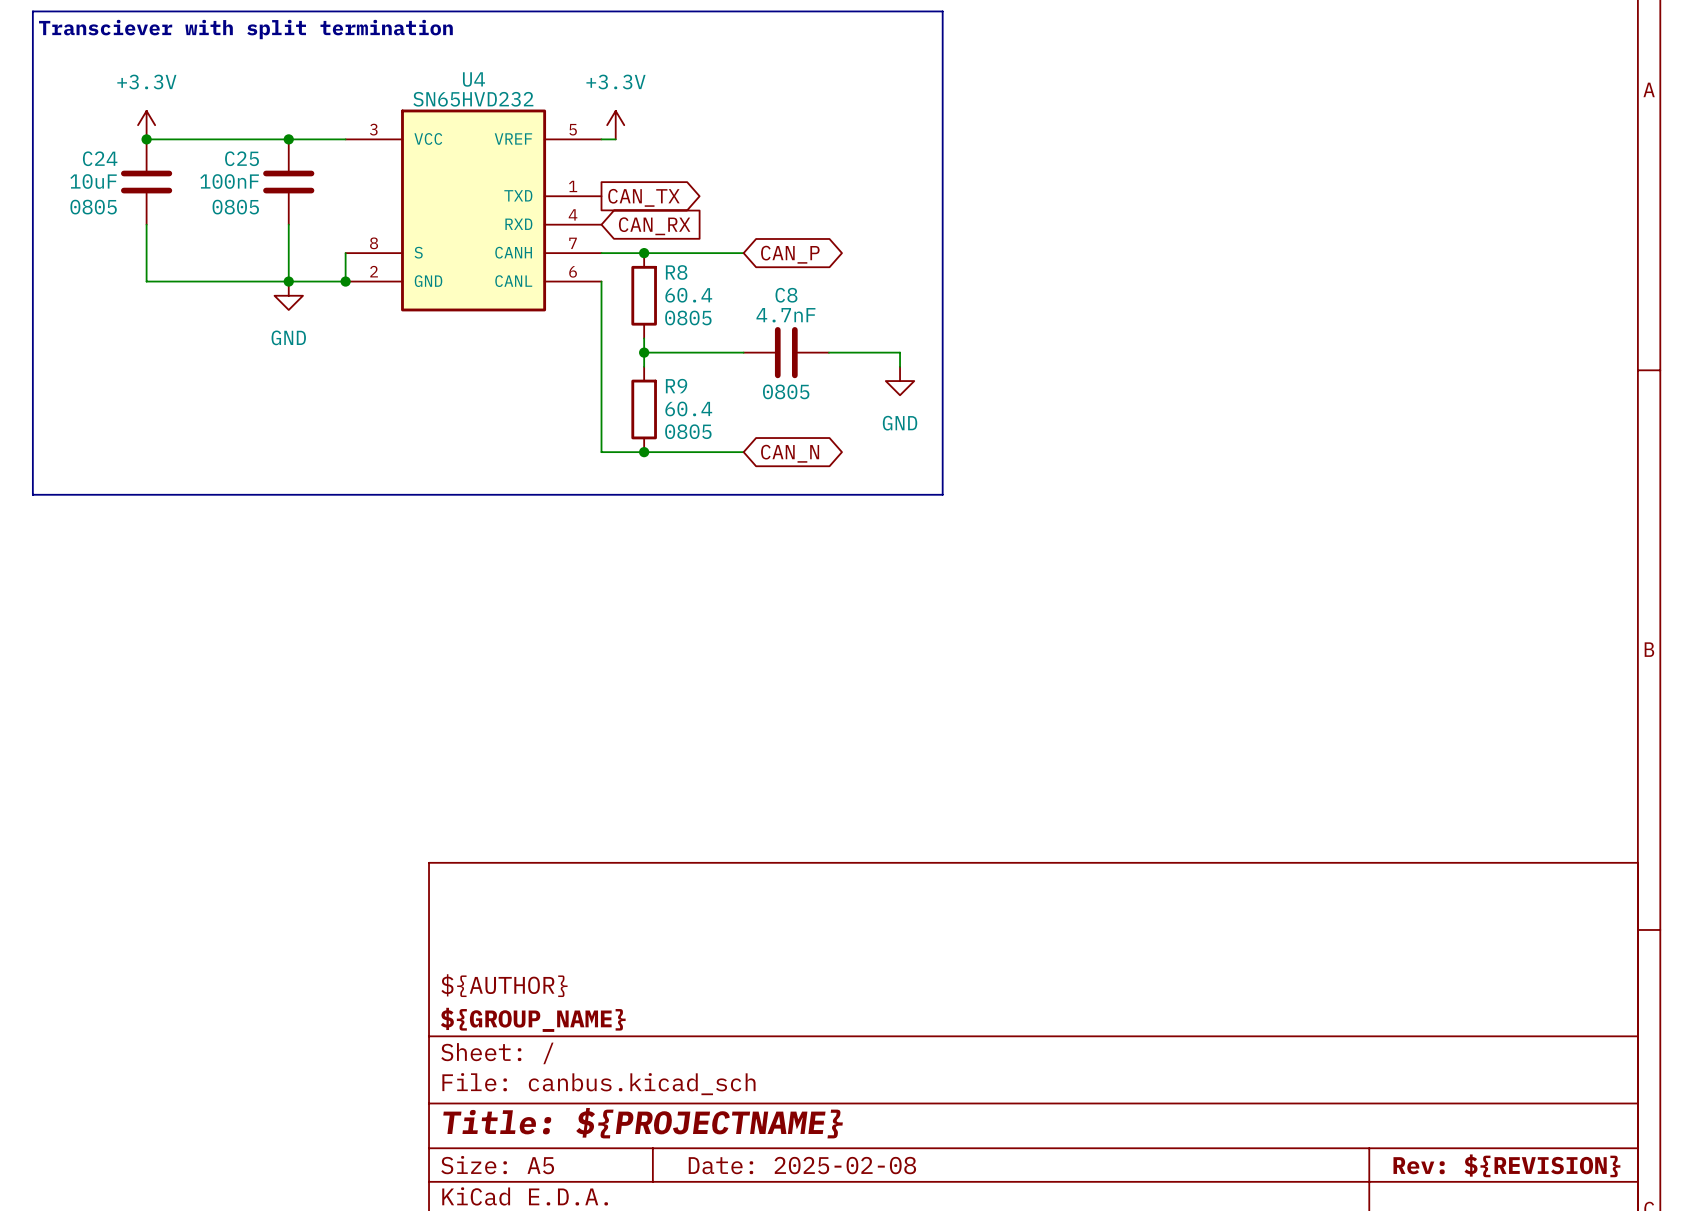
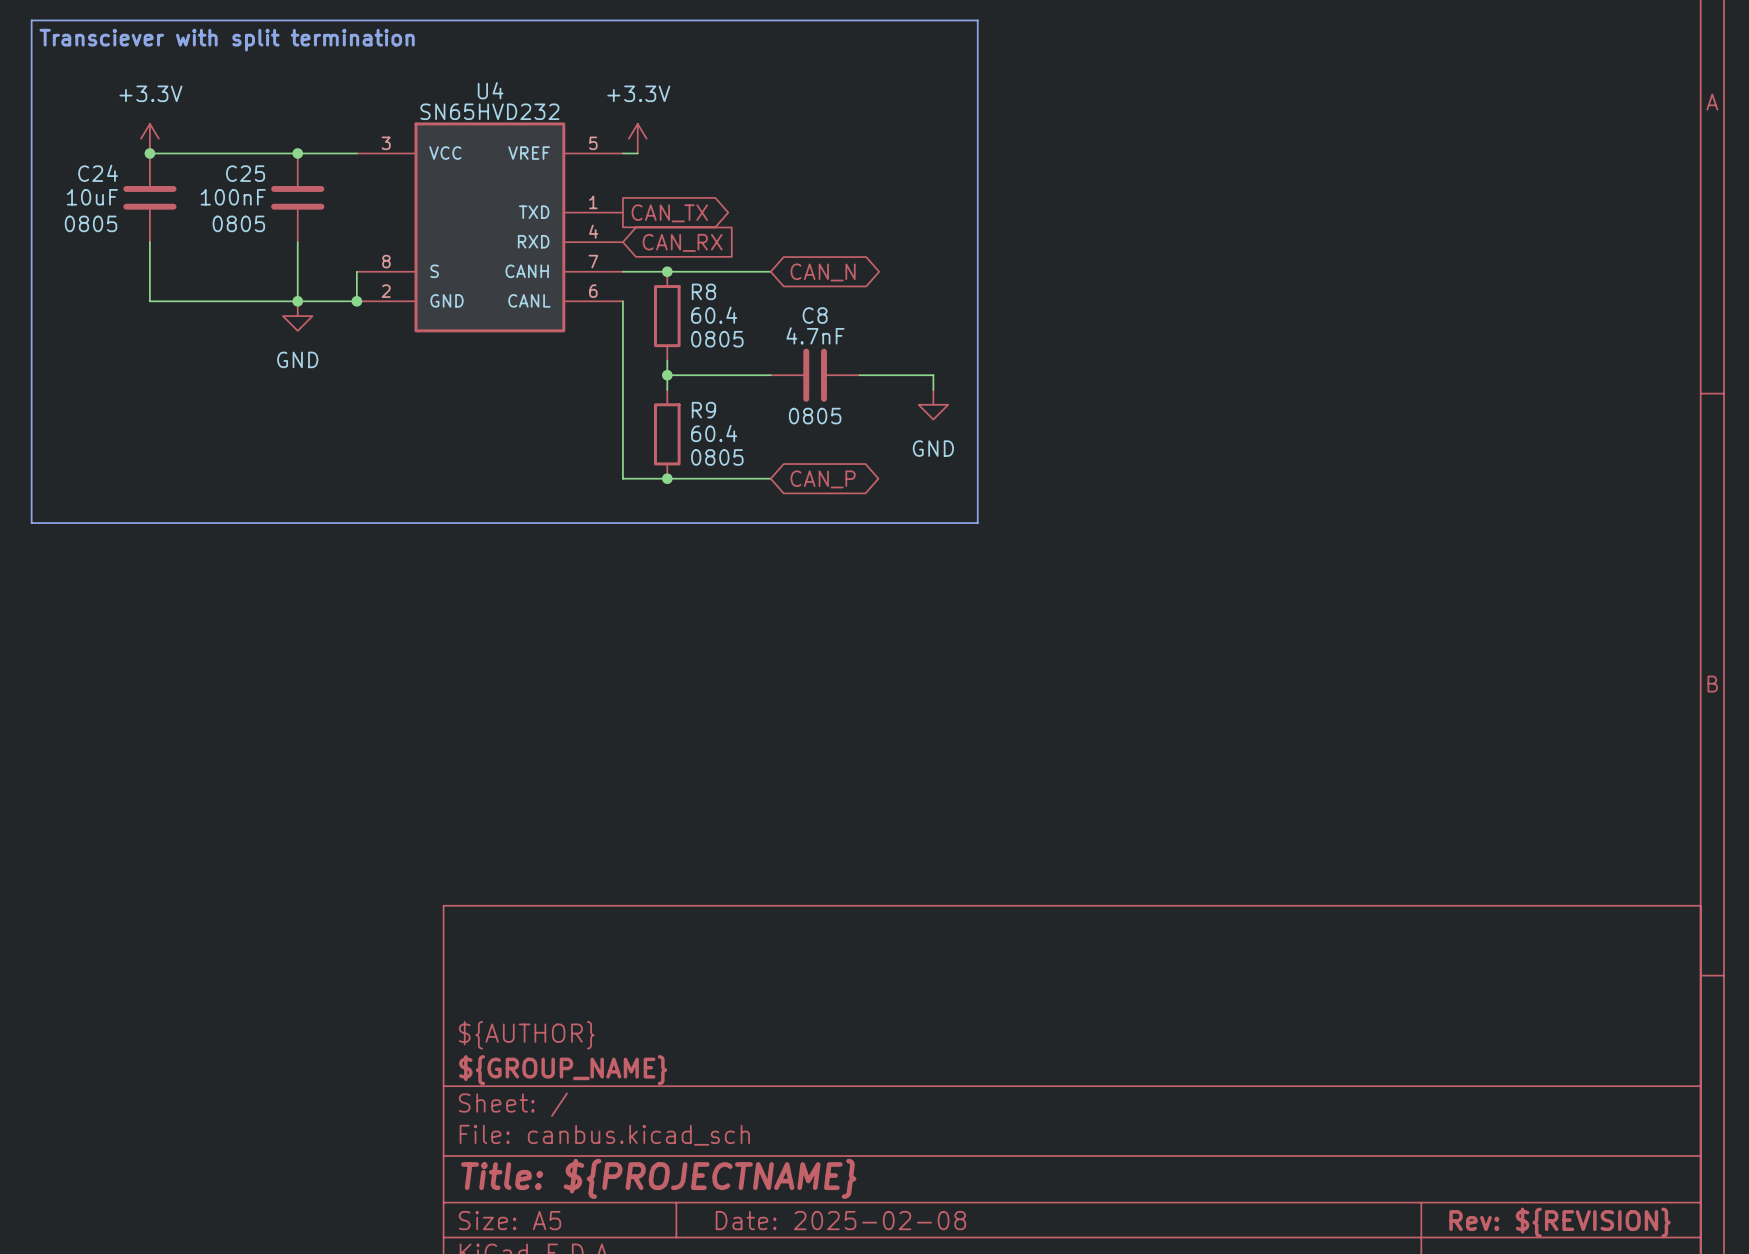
global label: CAN_P (790, 254) -> CAN_N (823, 272)
global label: CAN_N (790, 453) -> CAN_P (823, 479)

